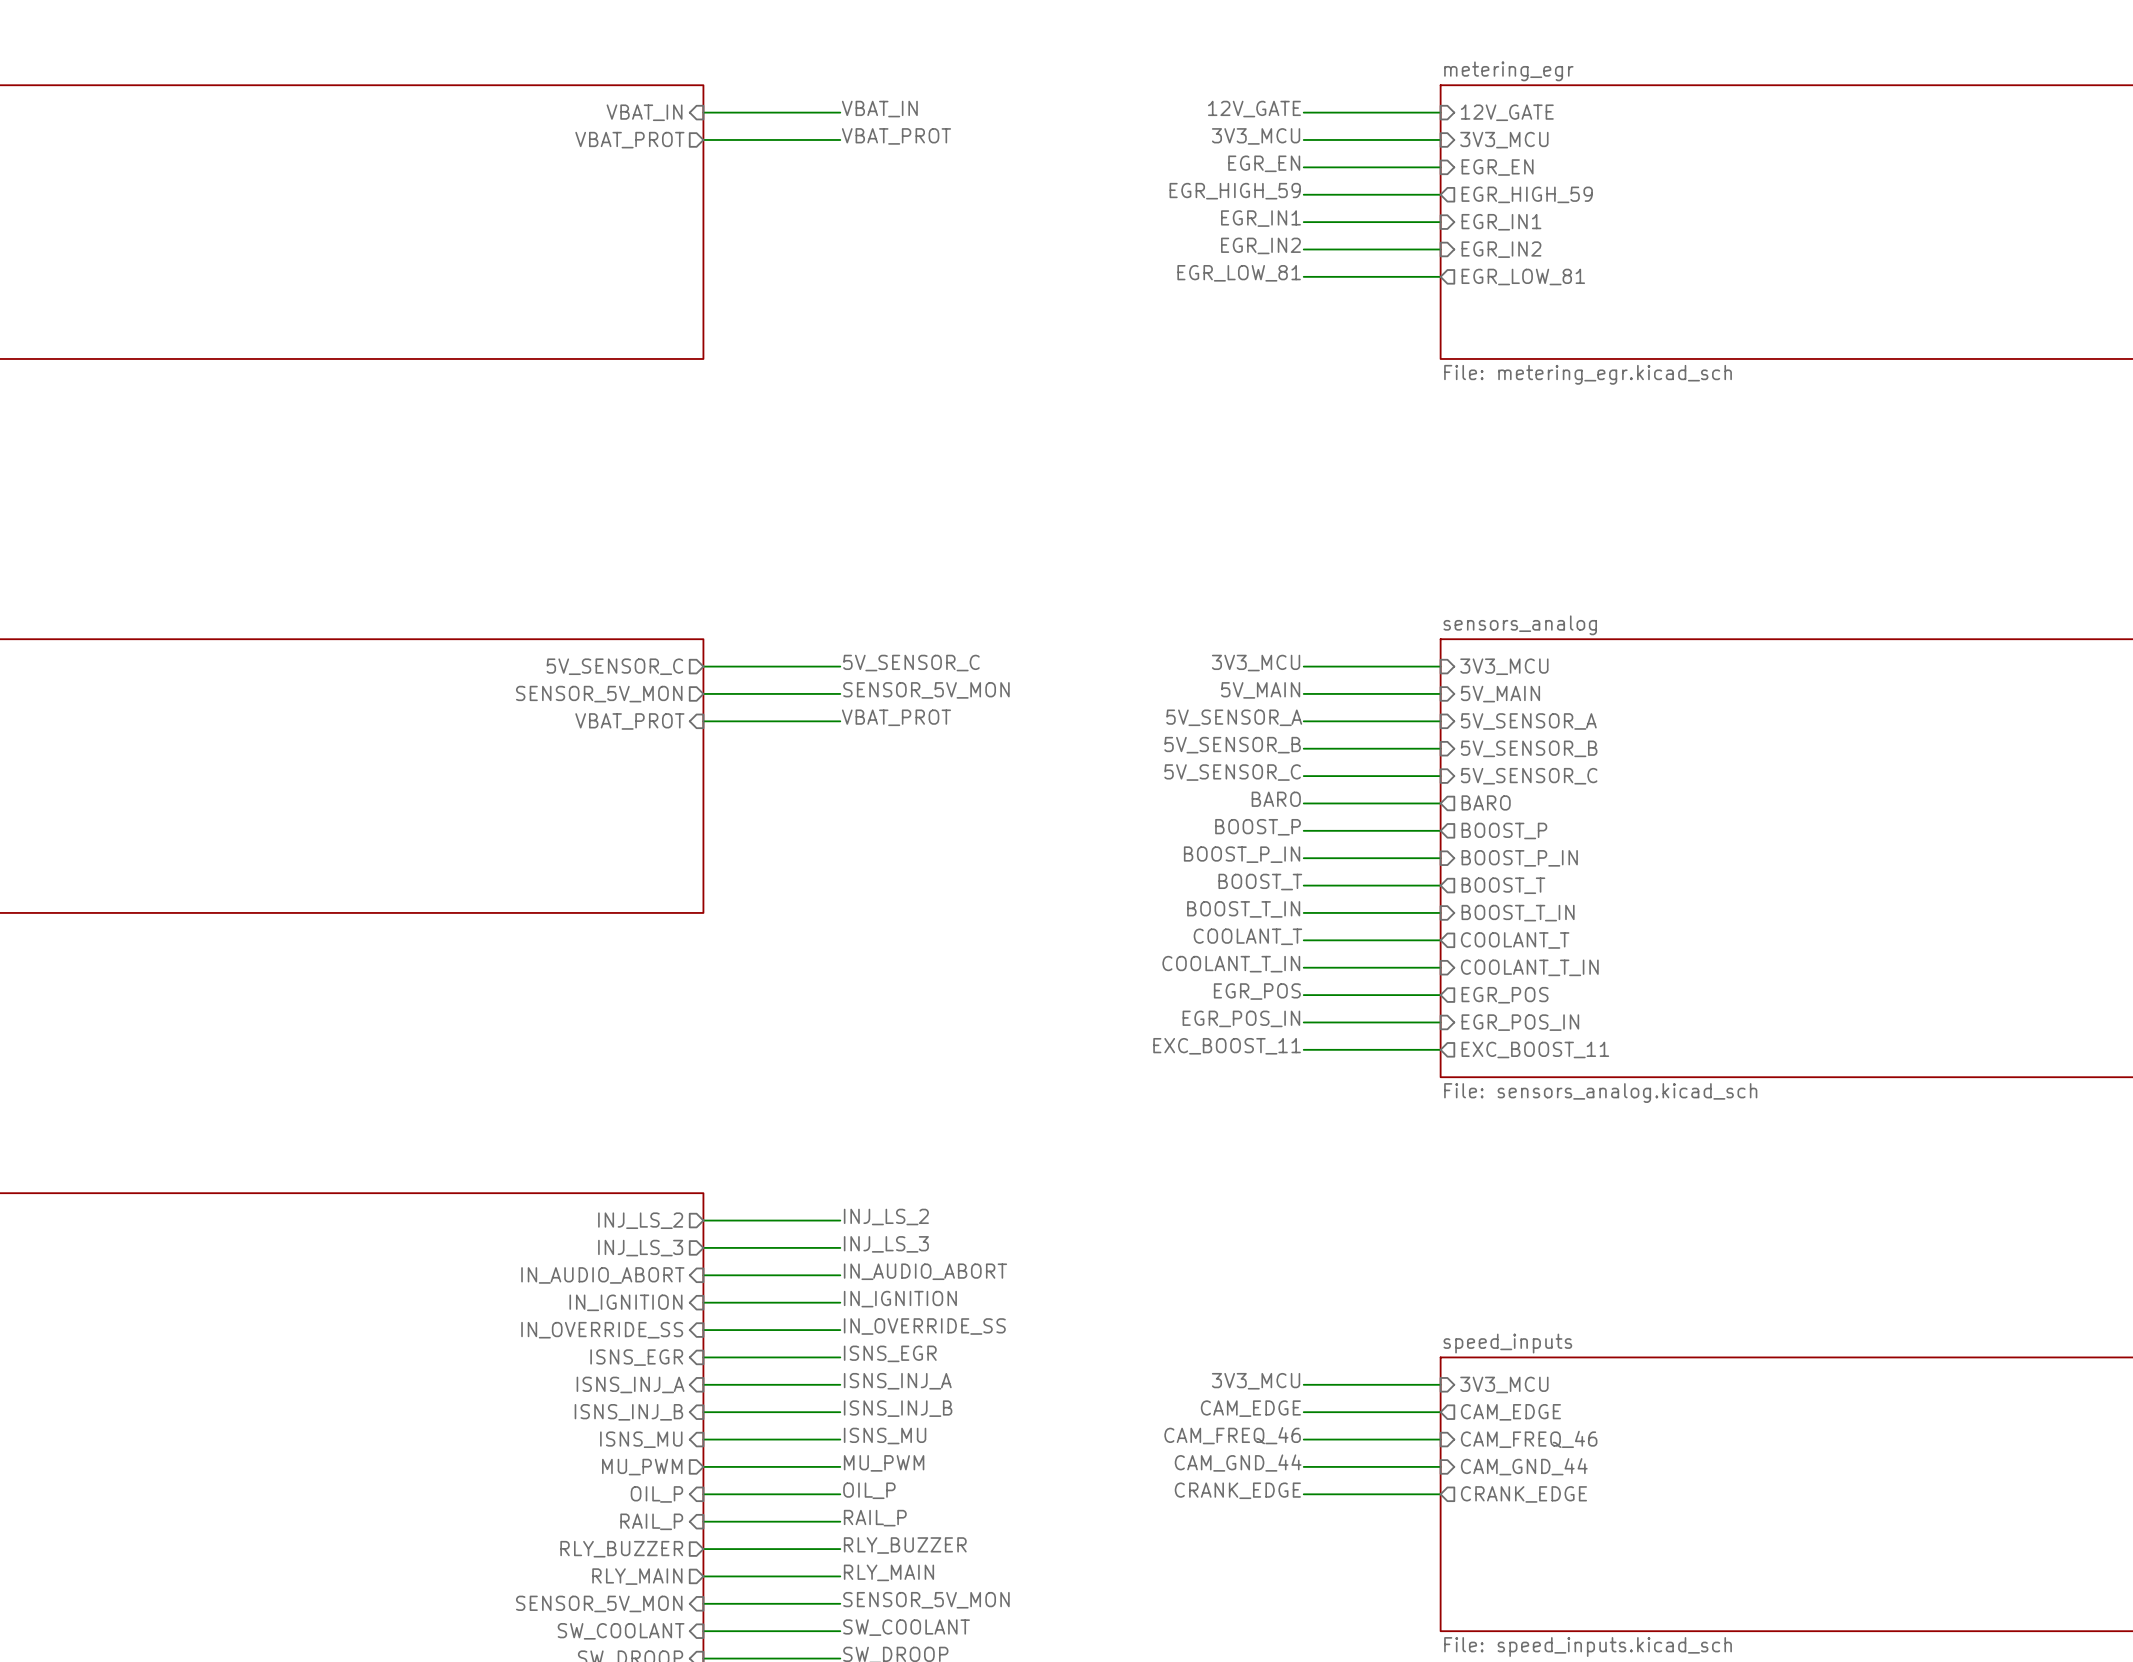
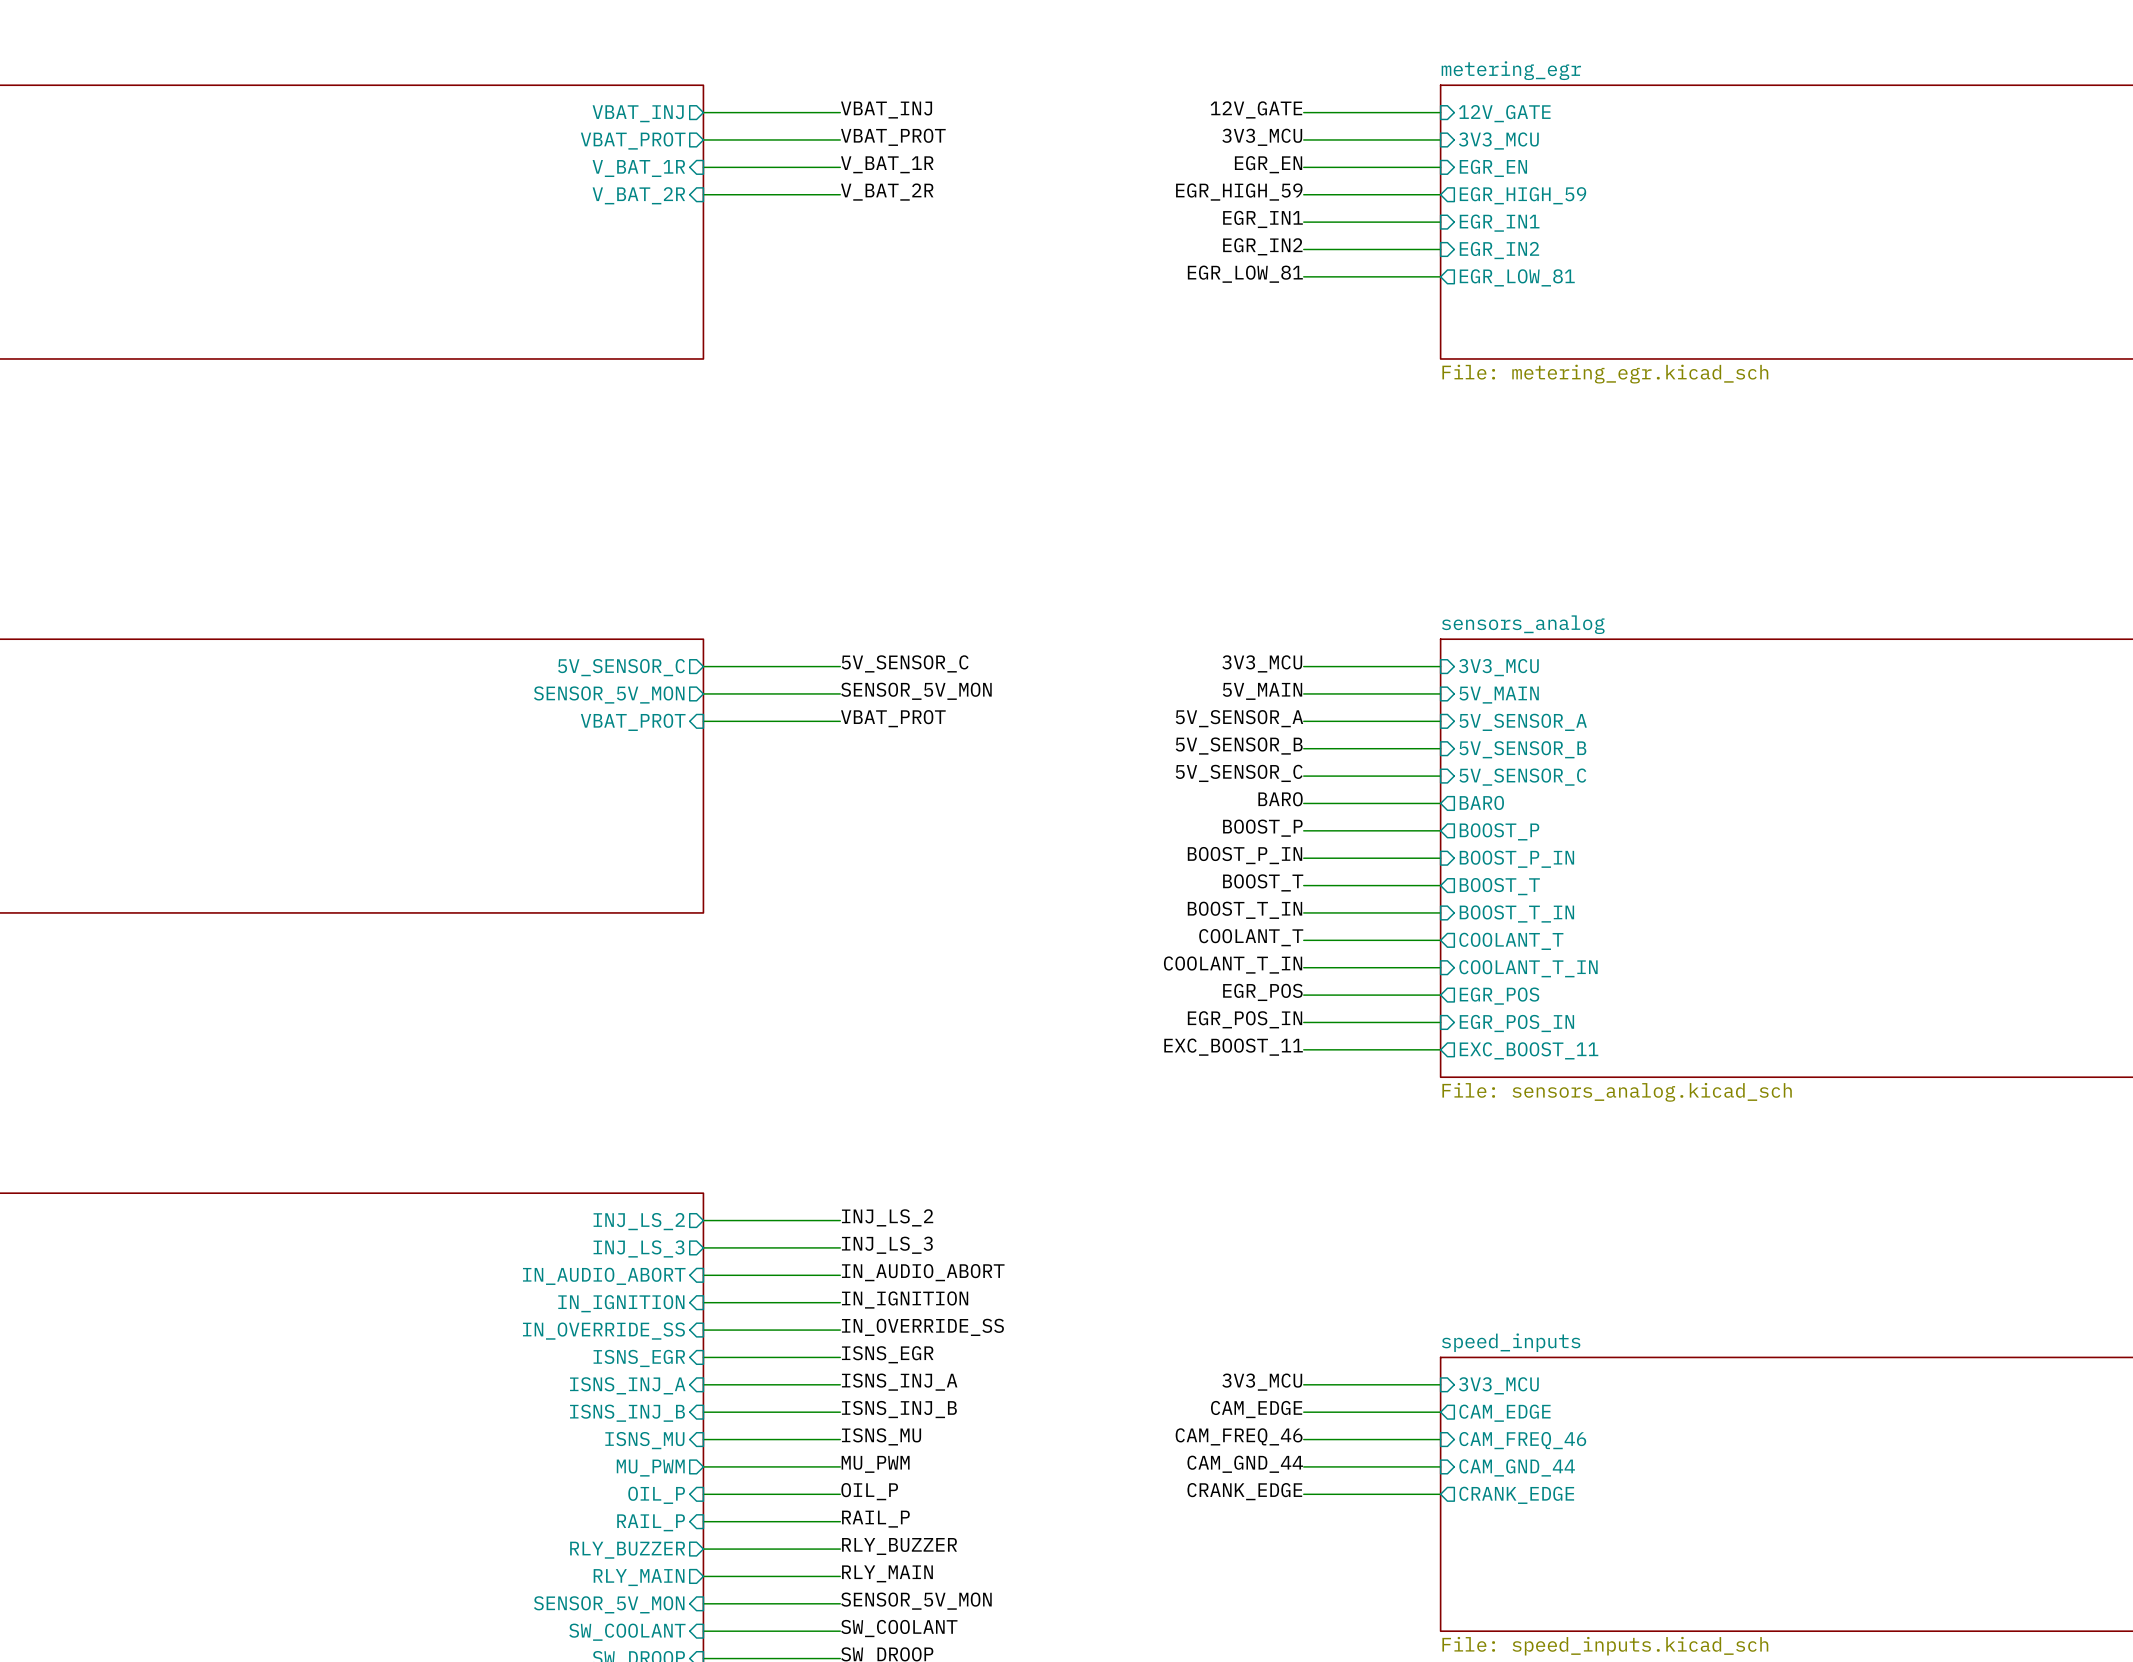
label: VBAT_IN (879, 109) -> VBAT_INJ (886, 110)
sheet pin shape: input (644, 112) -> output (638, 113)
sheet pin: VBAT_IN (644, 112) -> VBAT_INJ (638, 113)
label: none -> V_BAT_1R (887, 164)
sheet pin: none -> V_BAT_1R (638, 168)
wire: none -> (703, 167) (840, 167)
label: none -> V_BAT_2R (887, 192)
sheet pin: none -> V_BAT_2R (638, 195)
wire: none -> (703, 194) (840, 194)

